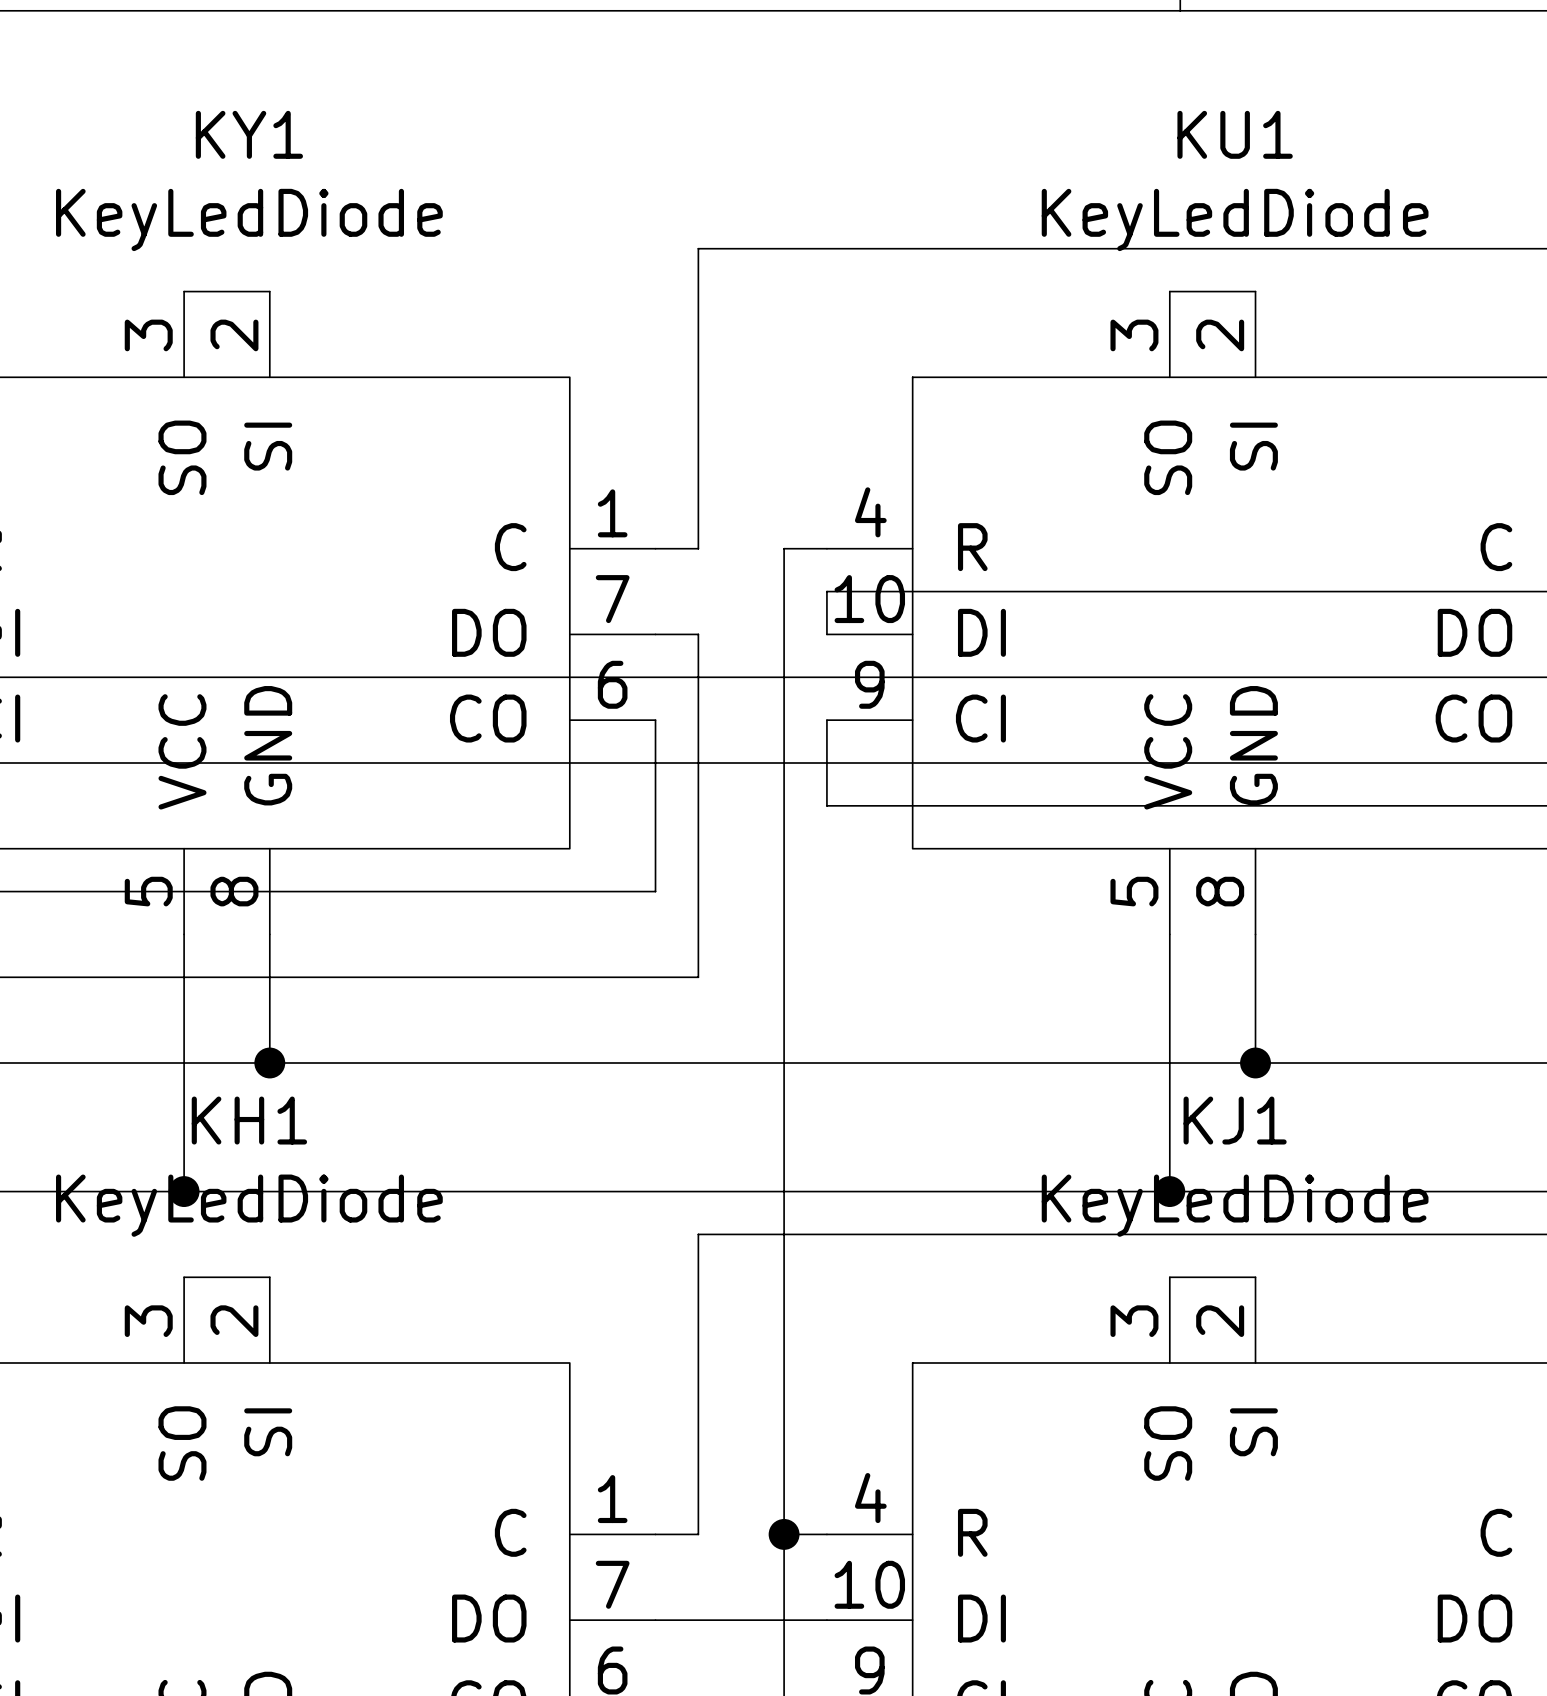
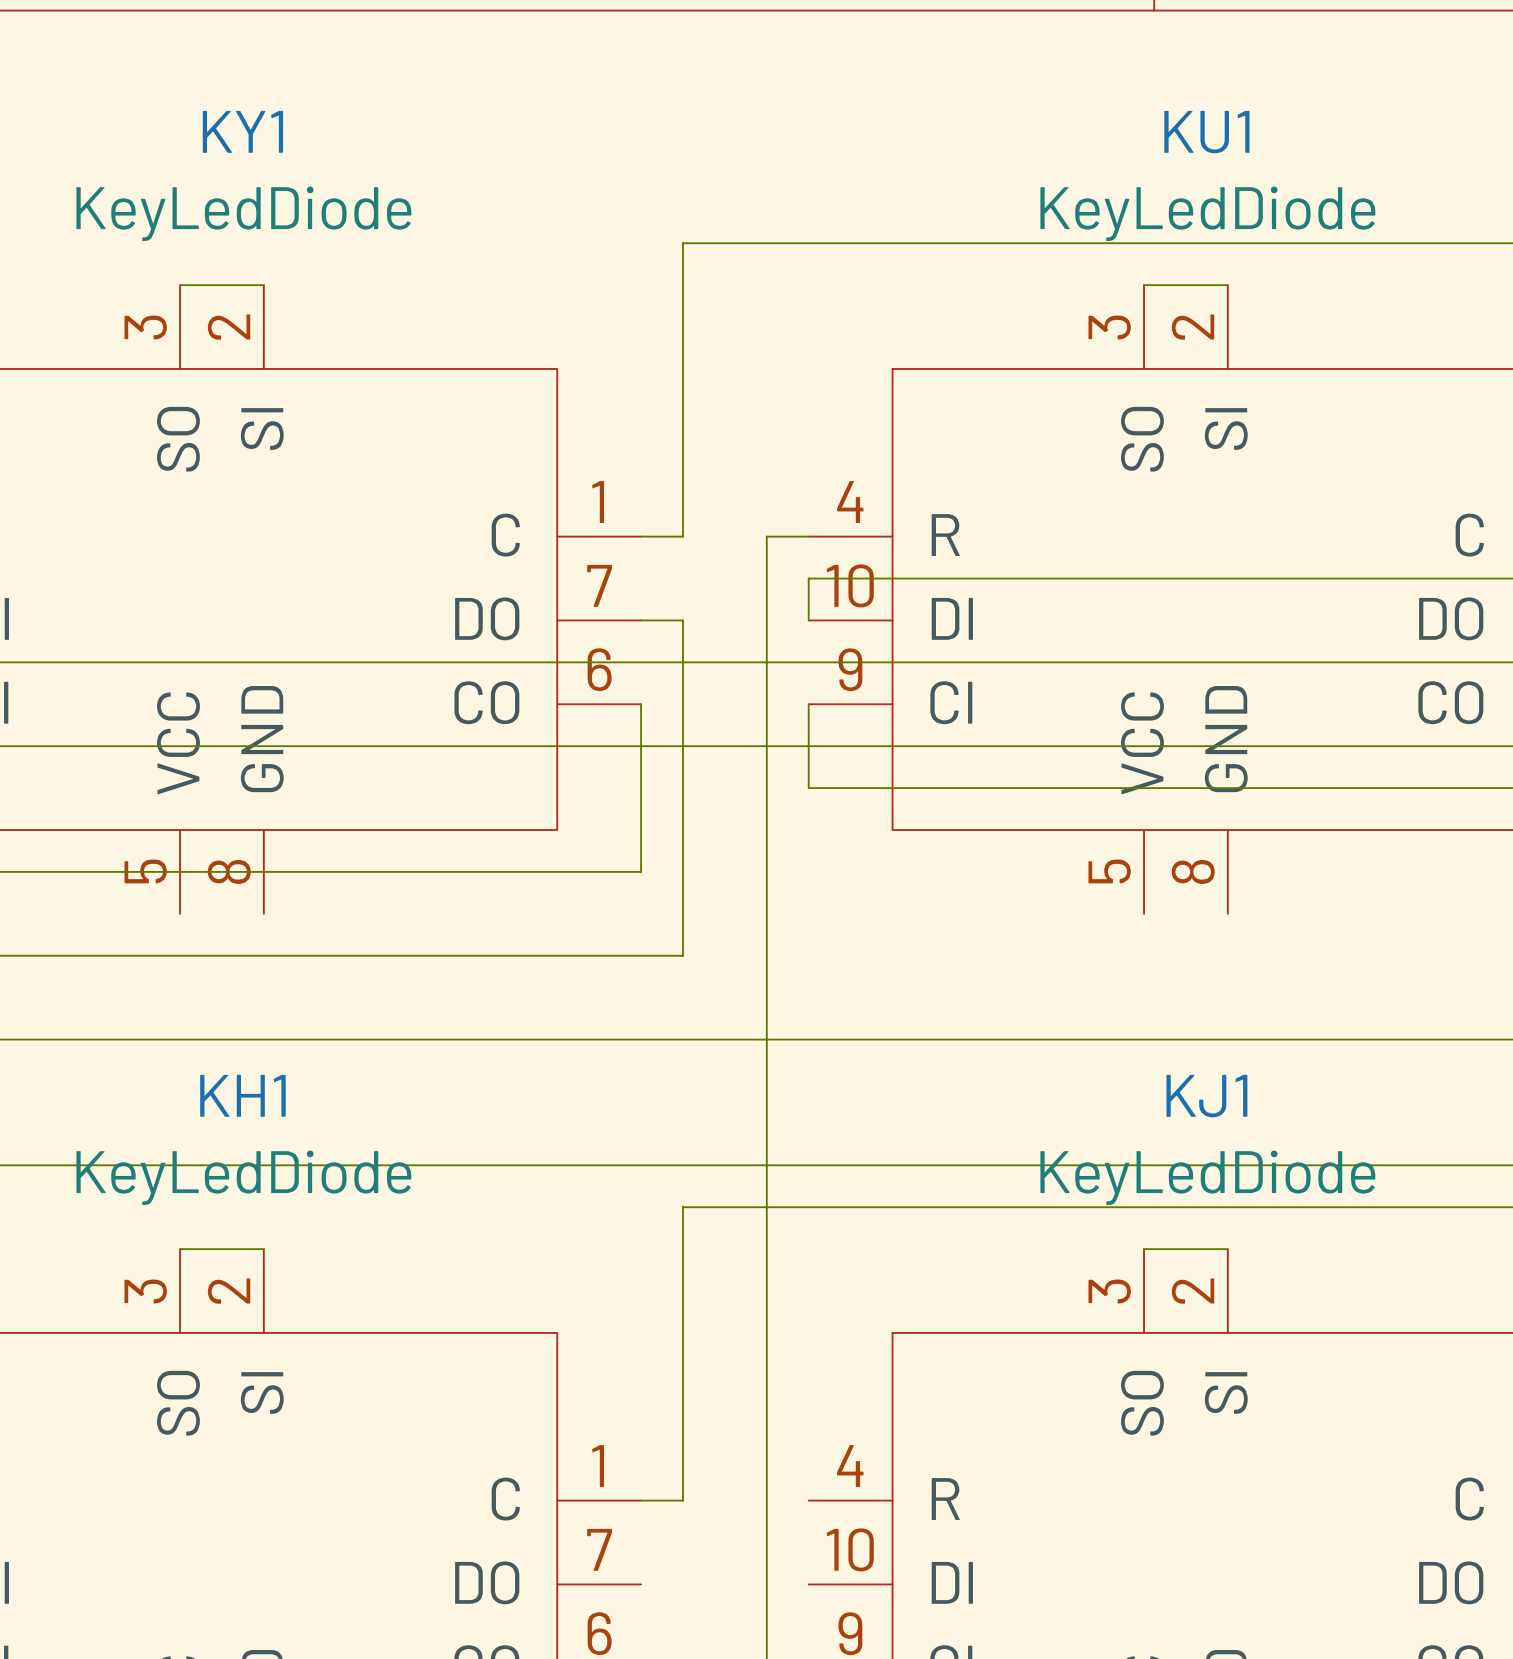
wire: (184, 934) (184, 1191) -> none
wire: (269, 934) (269, 1062) -> none
wire: (1169, 934) (1169, 1191) -> none
wire: (1255, 934) (1255, 1062) -> none
junction: (269, 1062) -> none
junction: (1255, 1062) -> none
junction: (184, 1191) -> none
junction: (1169, 1191) -> none
wire: (784, 1534) (826, 1534) -> none
junction: (784, 1534) -> none
wire: (655, 1620) (826, 1620) -> none

